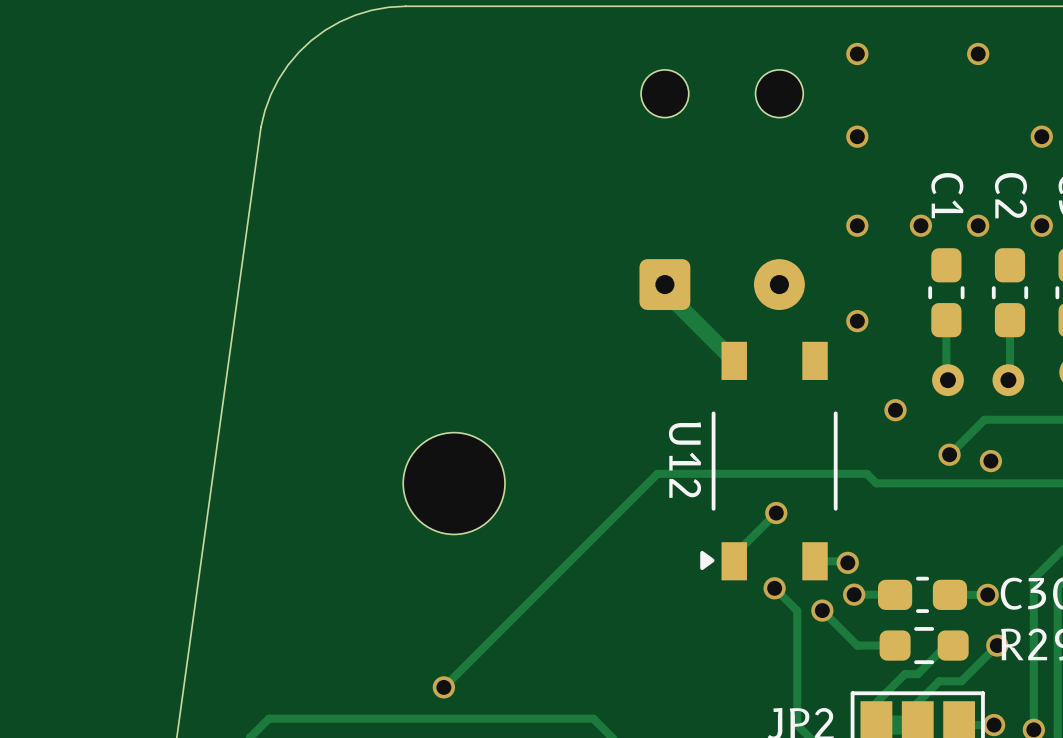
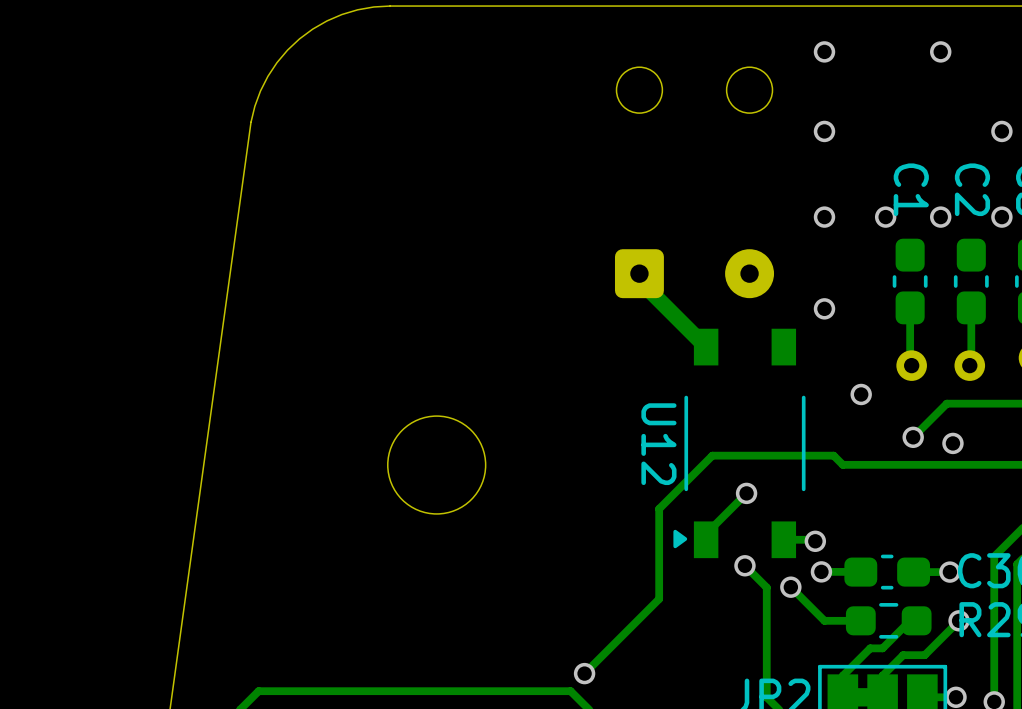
track: (740, 473) (657, 473) (443, 687) -> (712, 455) (659, 508) (659, 599) (584, 673)
via position: (443, 687) -> (584, 673)

